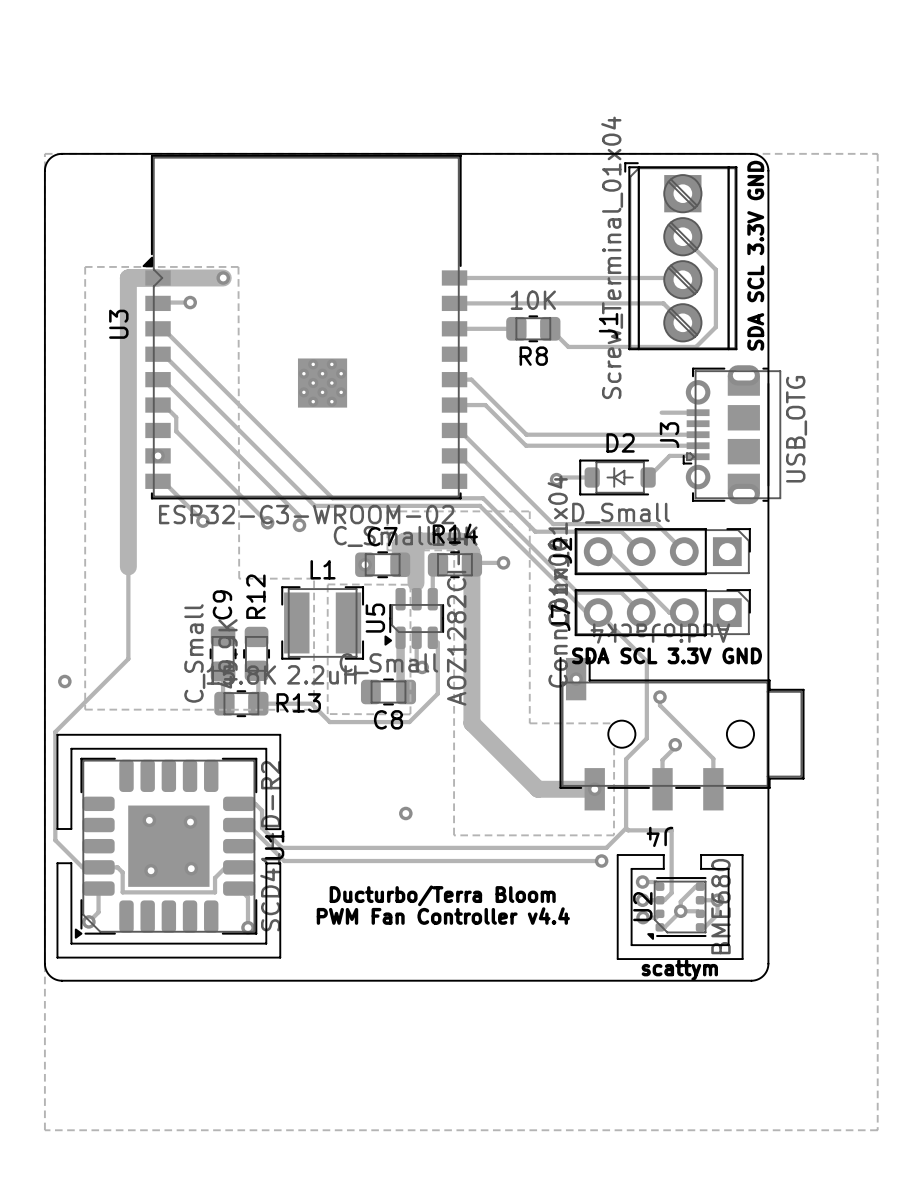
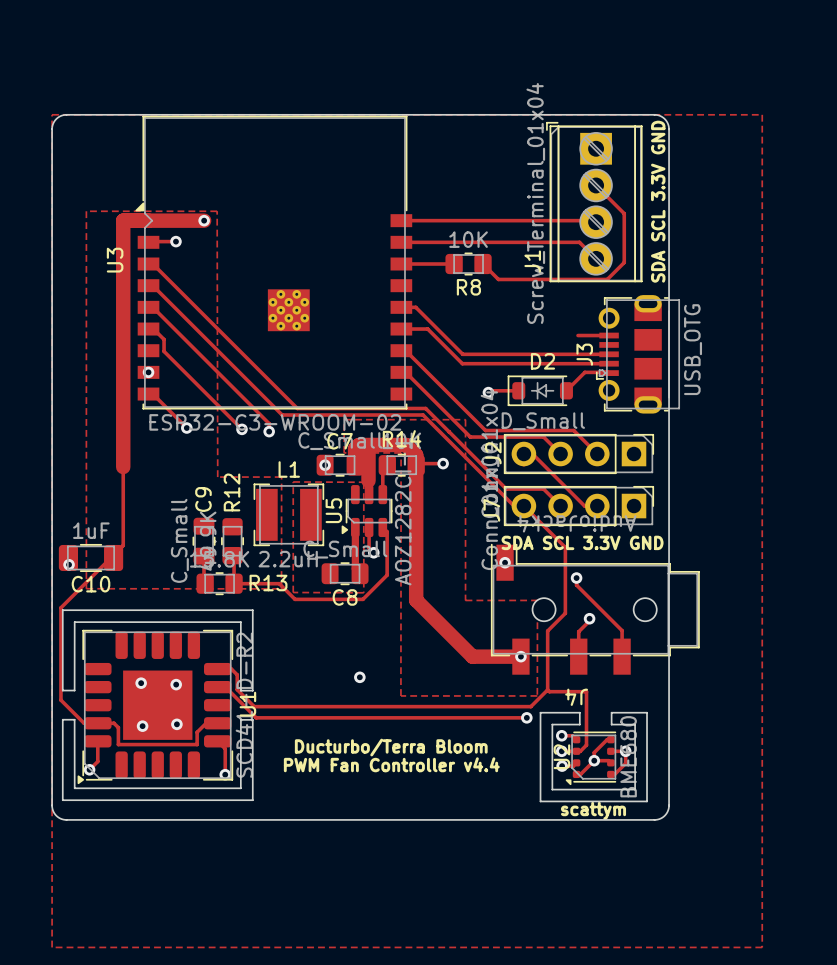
C10: none -> 1uF (91, 557)

